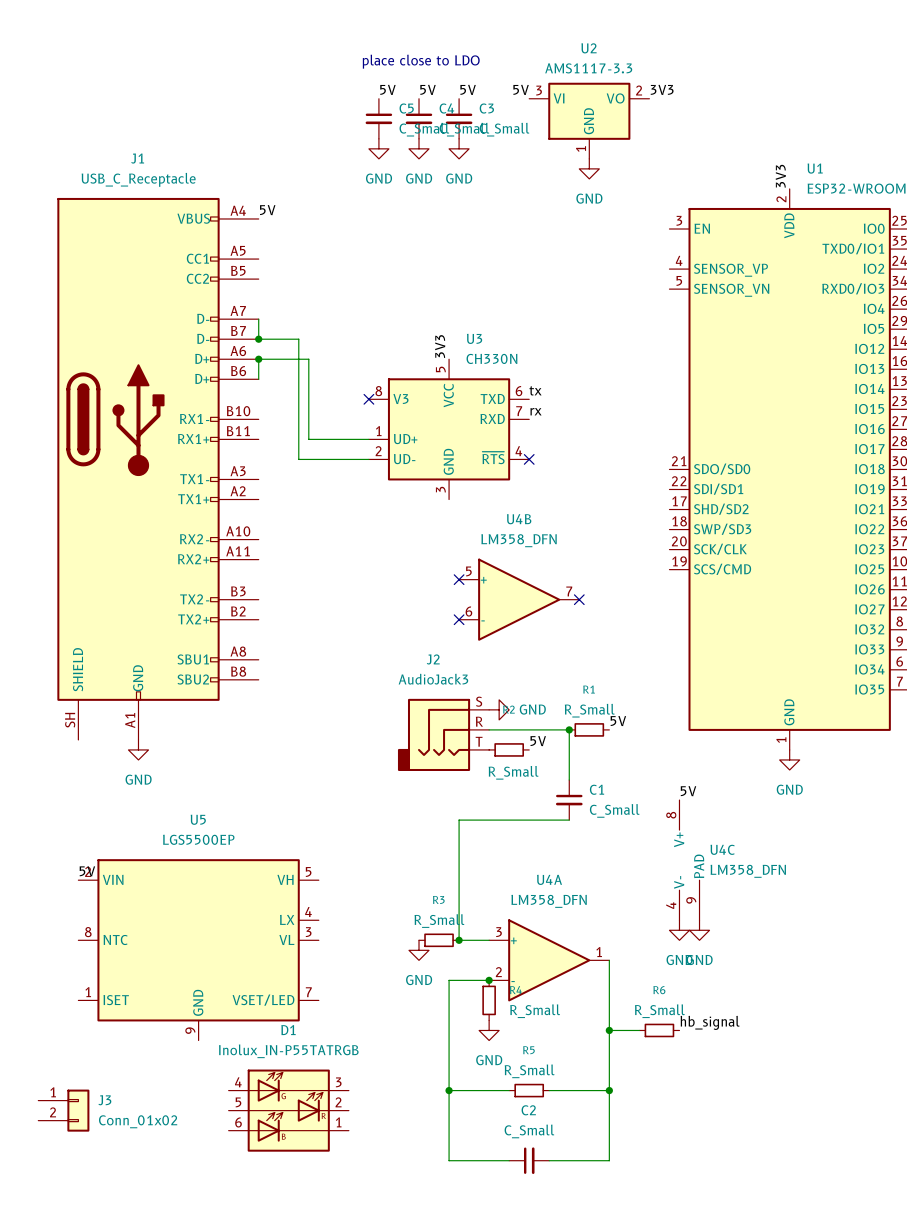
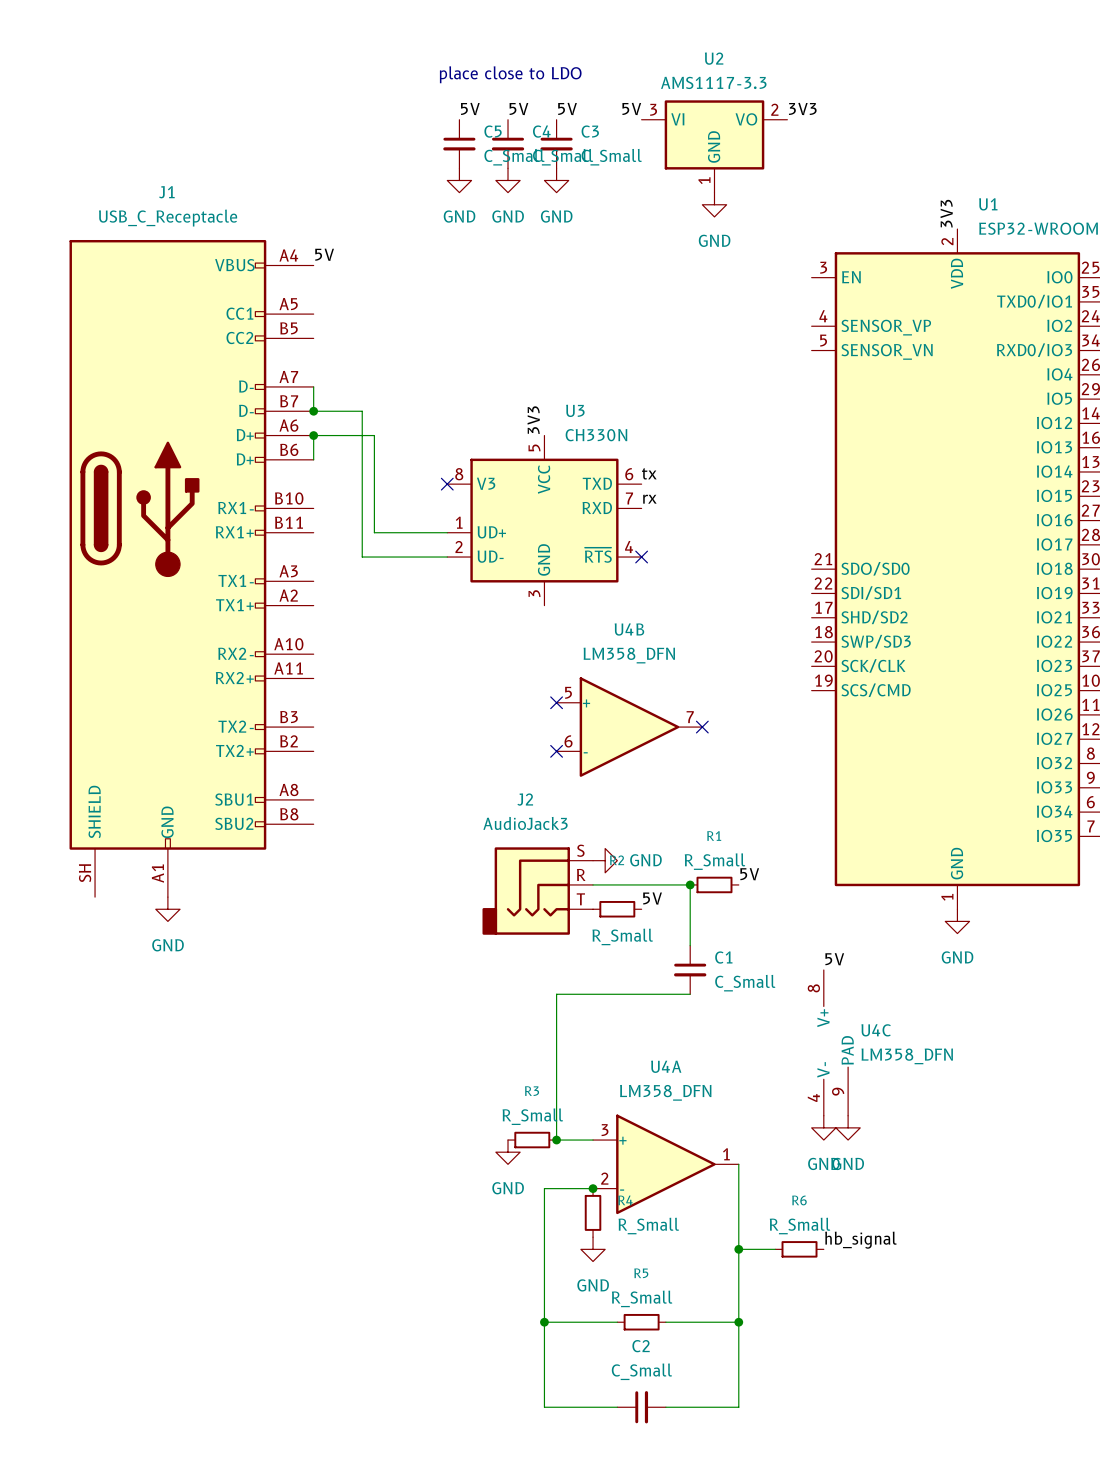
label: 5V (87, 871) -> none
U5: LGS5500EP (198, 949) -> none
J3: Conn_01x02 (63, 1110) -> none
D1: Inolux_IN-P55TATRGB (288, 1110) -> none

